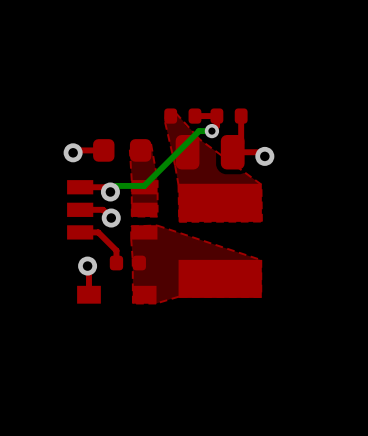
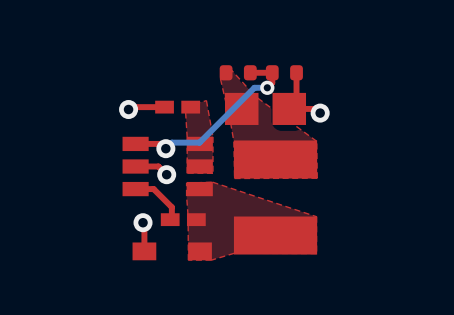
part footprint: [175, 135, 245, 170] -> [224, 92, 307, 125]
part footprint: [93, 139, 152, 162] -> [155, 100, 201, 114]
part footprint: [109, 255, 146, 271] -> [160, 213, 206, 227]

